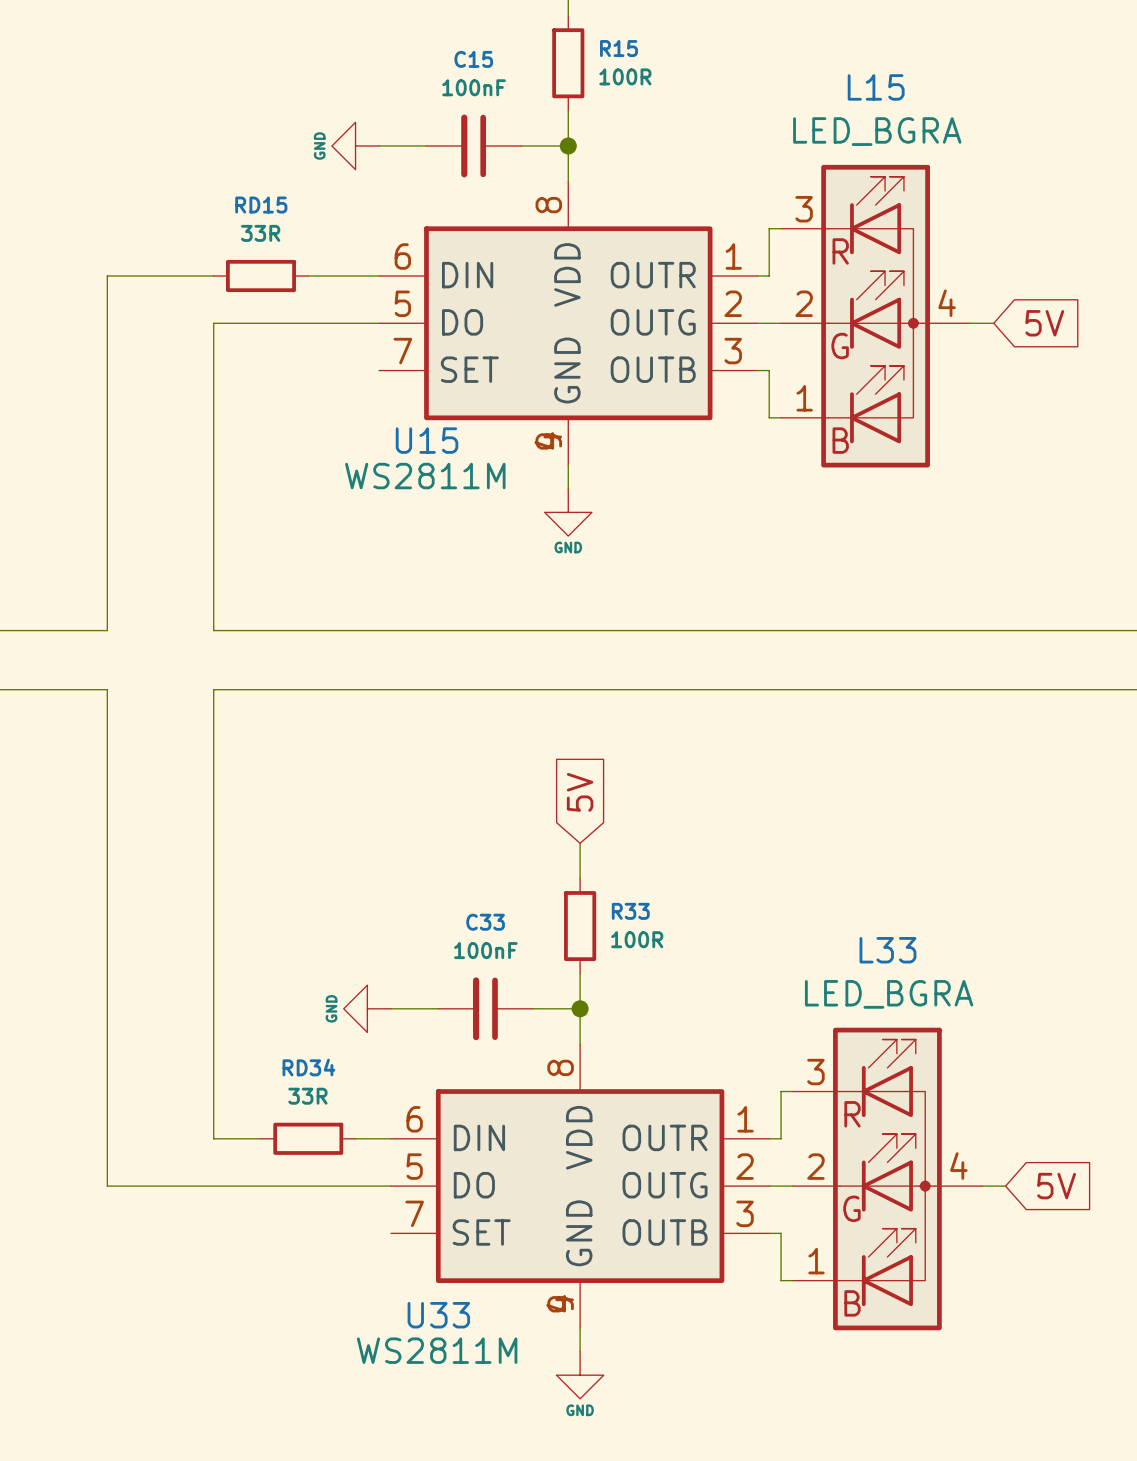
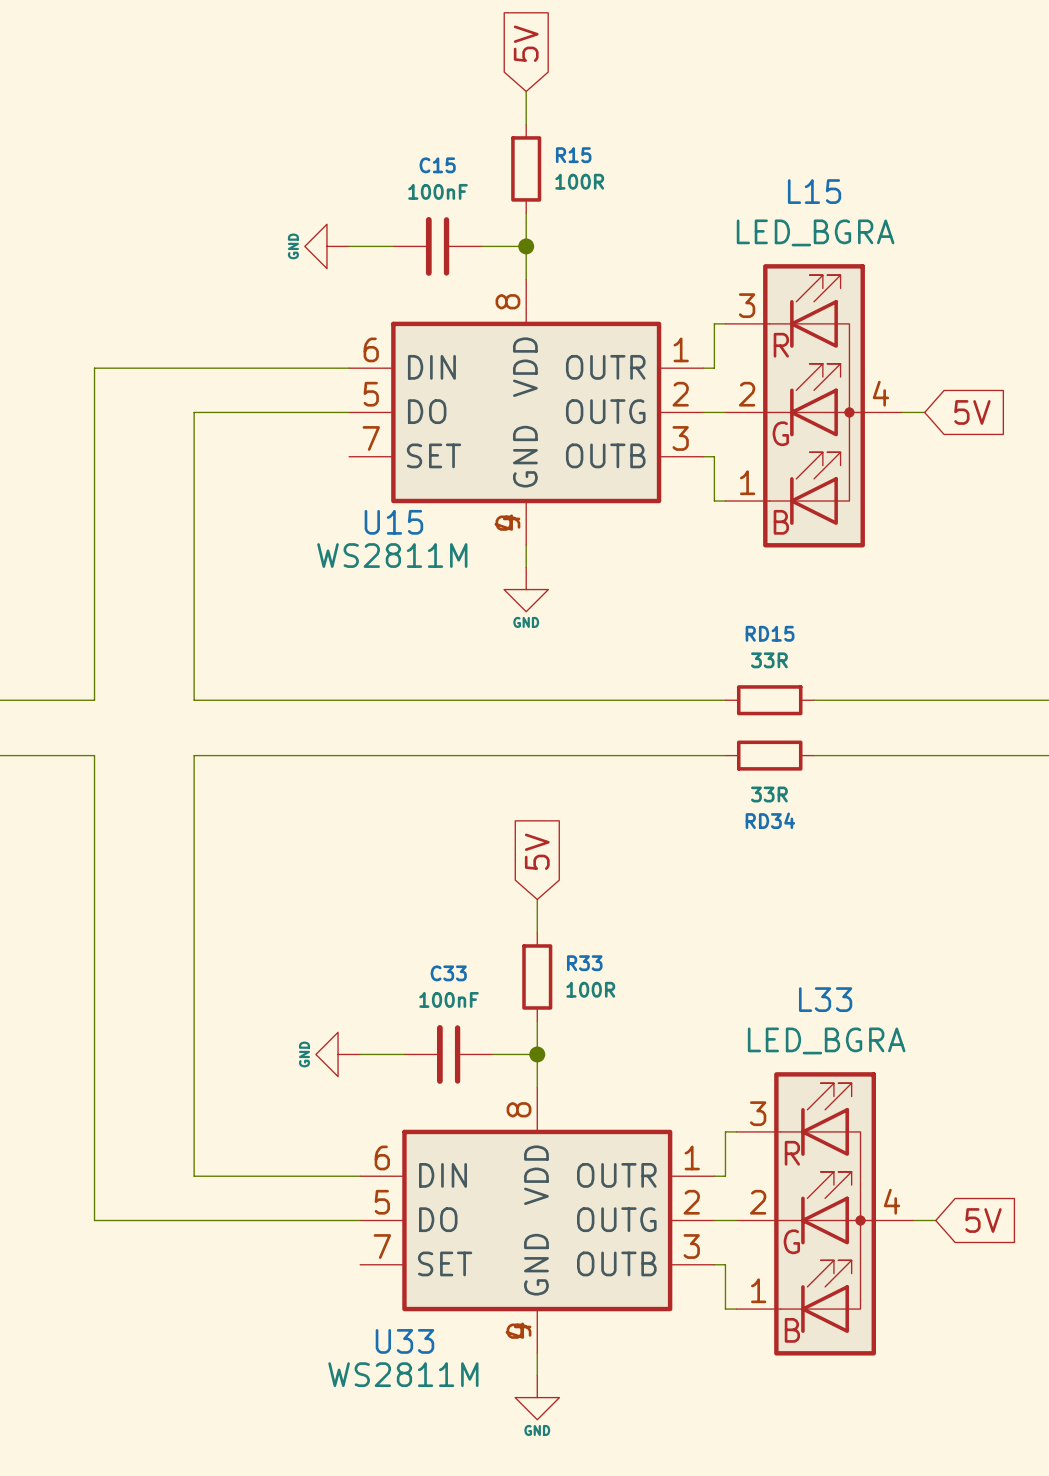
wire: none -> (194, 368) (282, 368)
RD15 position: (260, 276) -> (769, 700)
wire: (781, 630) (875, 630) -> none
wire: (781, 689) (875, 689) -> none
RD34 name position: RD34 (308, 1067) -> RD34 (770, 820)
RD34 value position: 33R (307, 1096) -> 33R (769, 794)
wire: none -> (238, 1176) (326, 1176)
RD34 position: (308, 1138) -> (769, 755)

